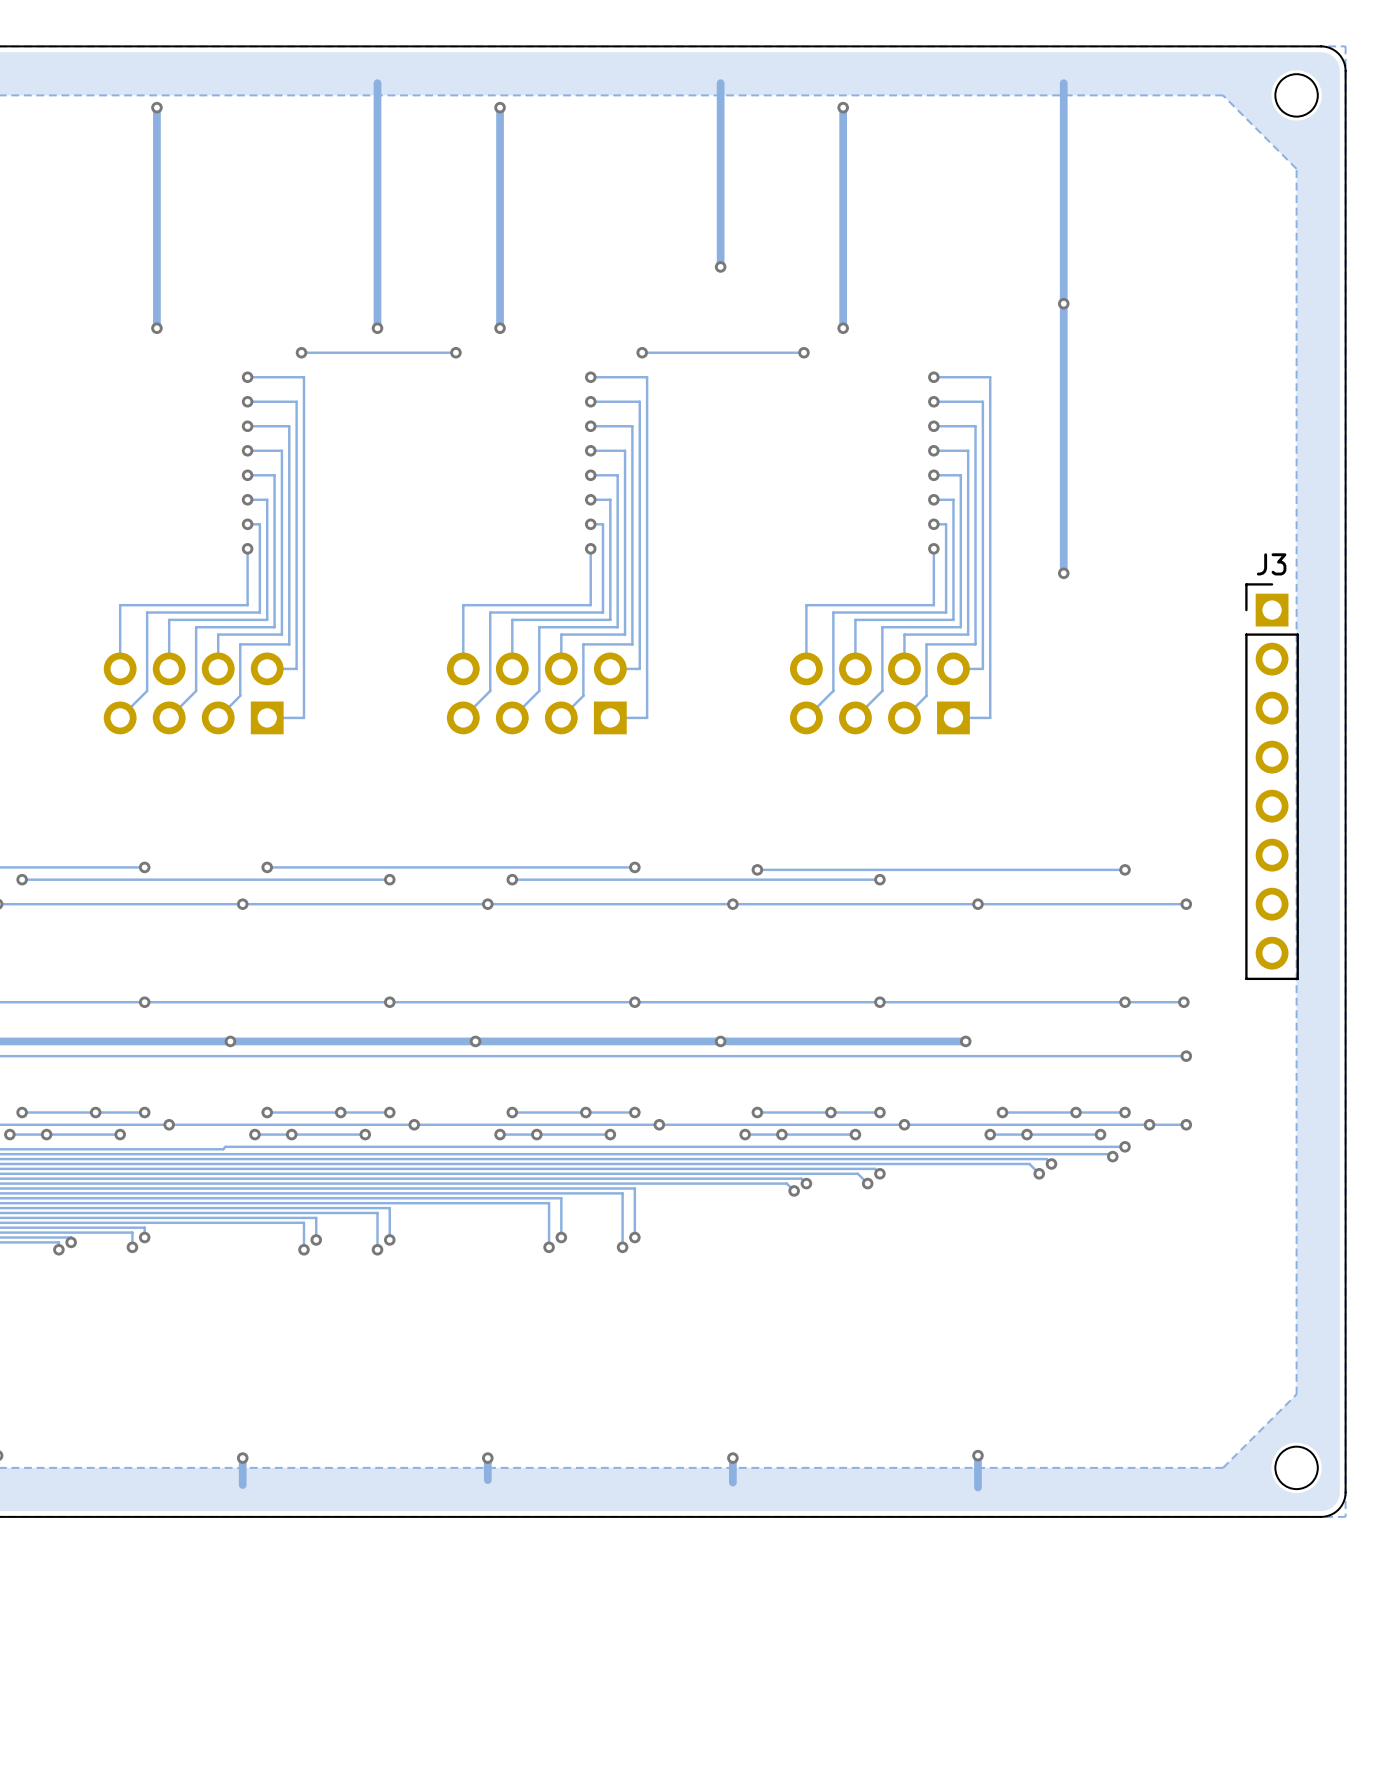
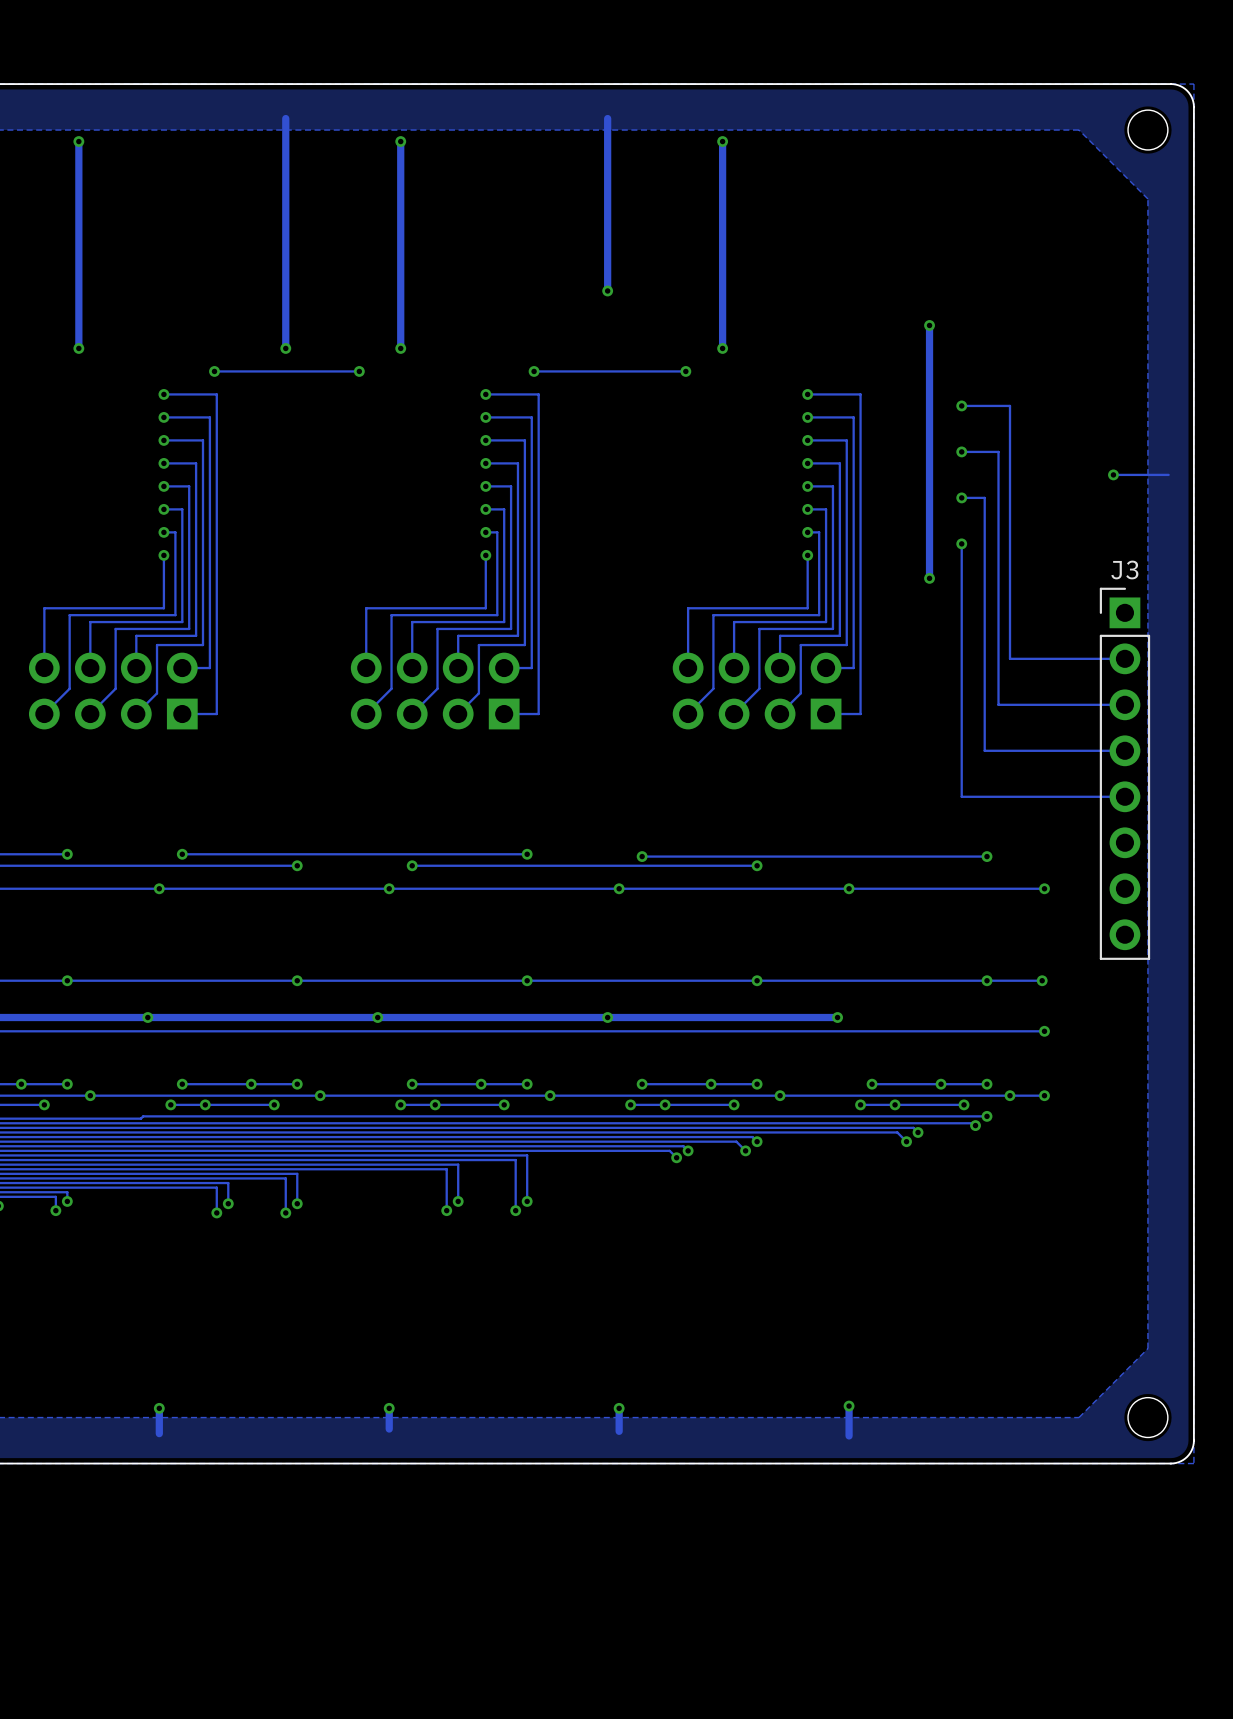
track: (1063, 83) (1063, 303) -> none
track: none -> (961, 405) (1010, 405) (1010, 658) (1124, 658)
via: none -> (961, 405)
track: none -> (961, 451) (998, 451) (998, 704) (1124, 704)
via: none -> (961, 451)
via: none -> (1113, 474)
track: none -> (1168, 474) (1113, 474)
track: none -> (961, 497) (984, 497) (984, 750) (1124, 750)
via: none -> (961, 497)
track: none -> (961, 543) (961, 796) (1124, 796)
via: none -> (961, 543)

